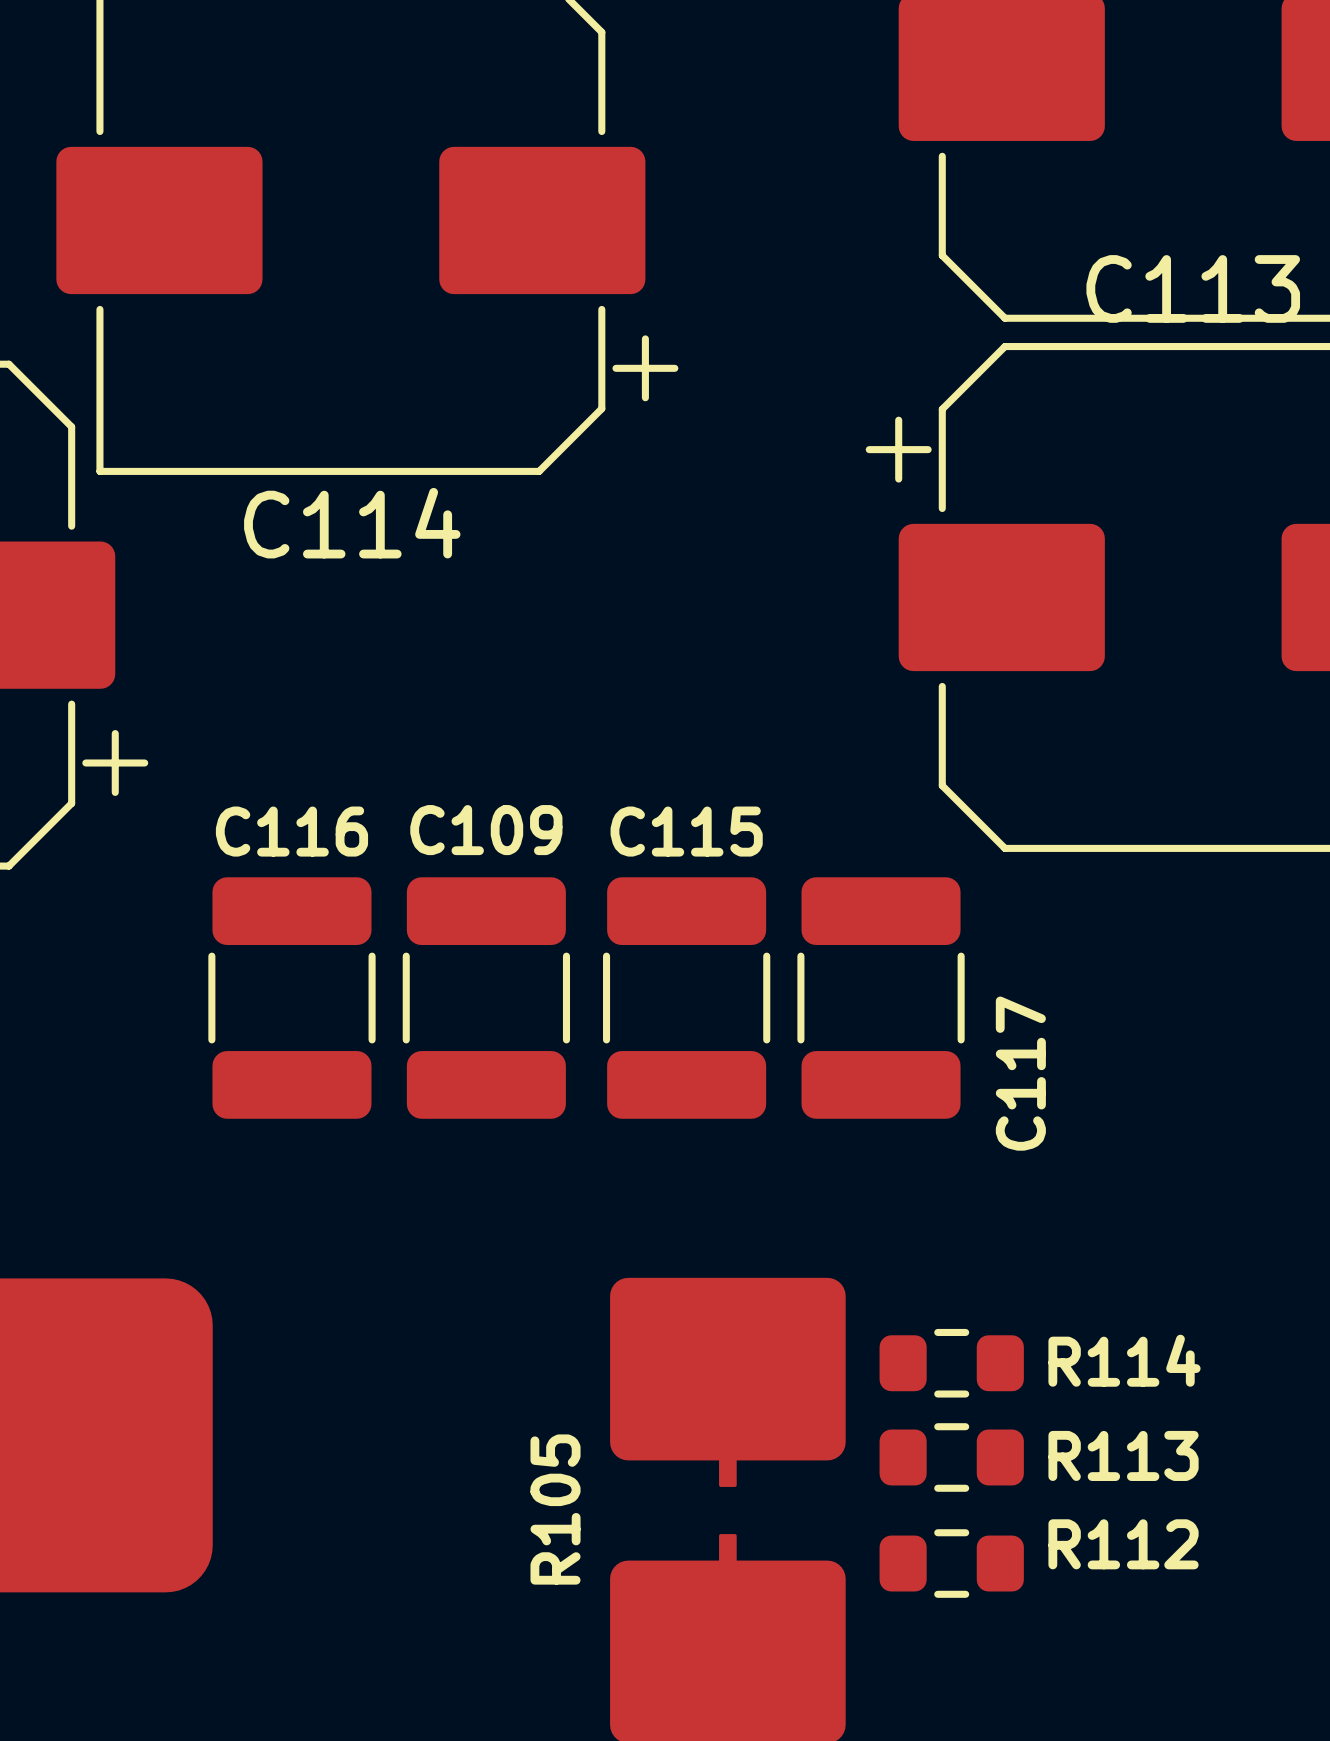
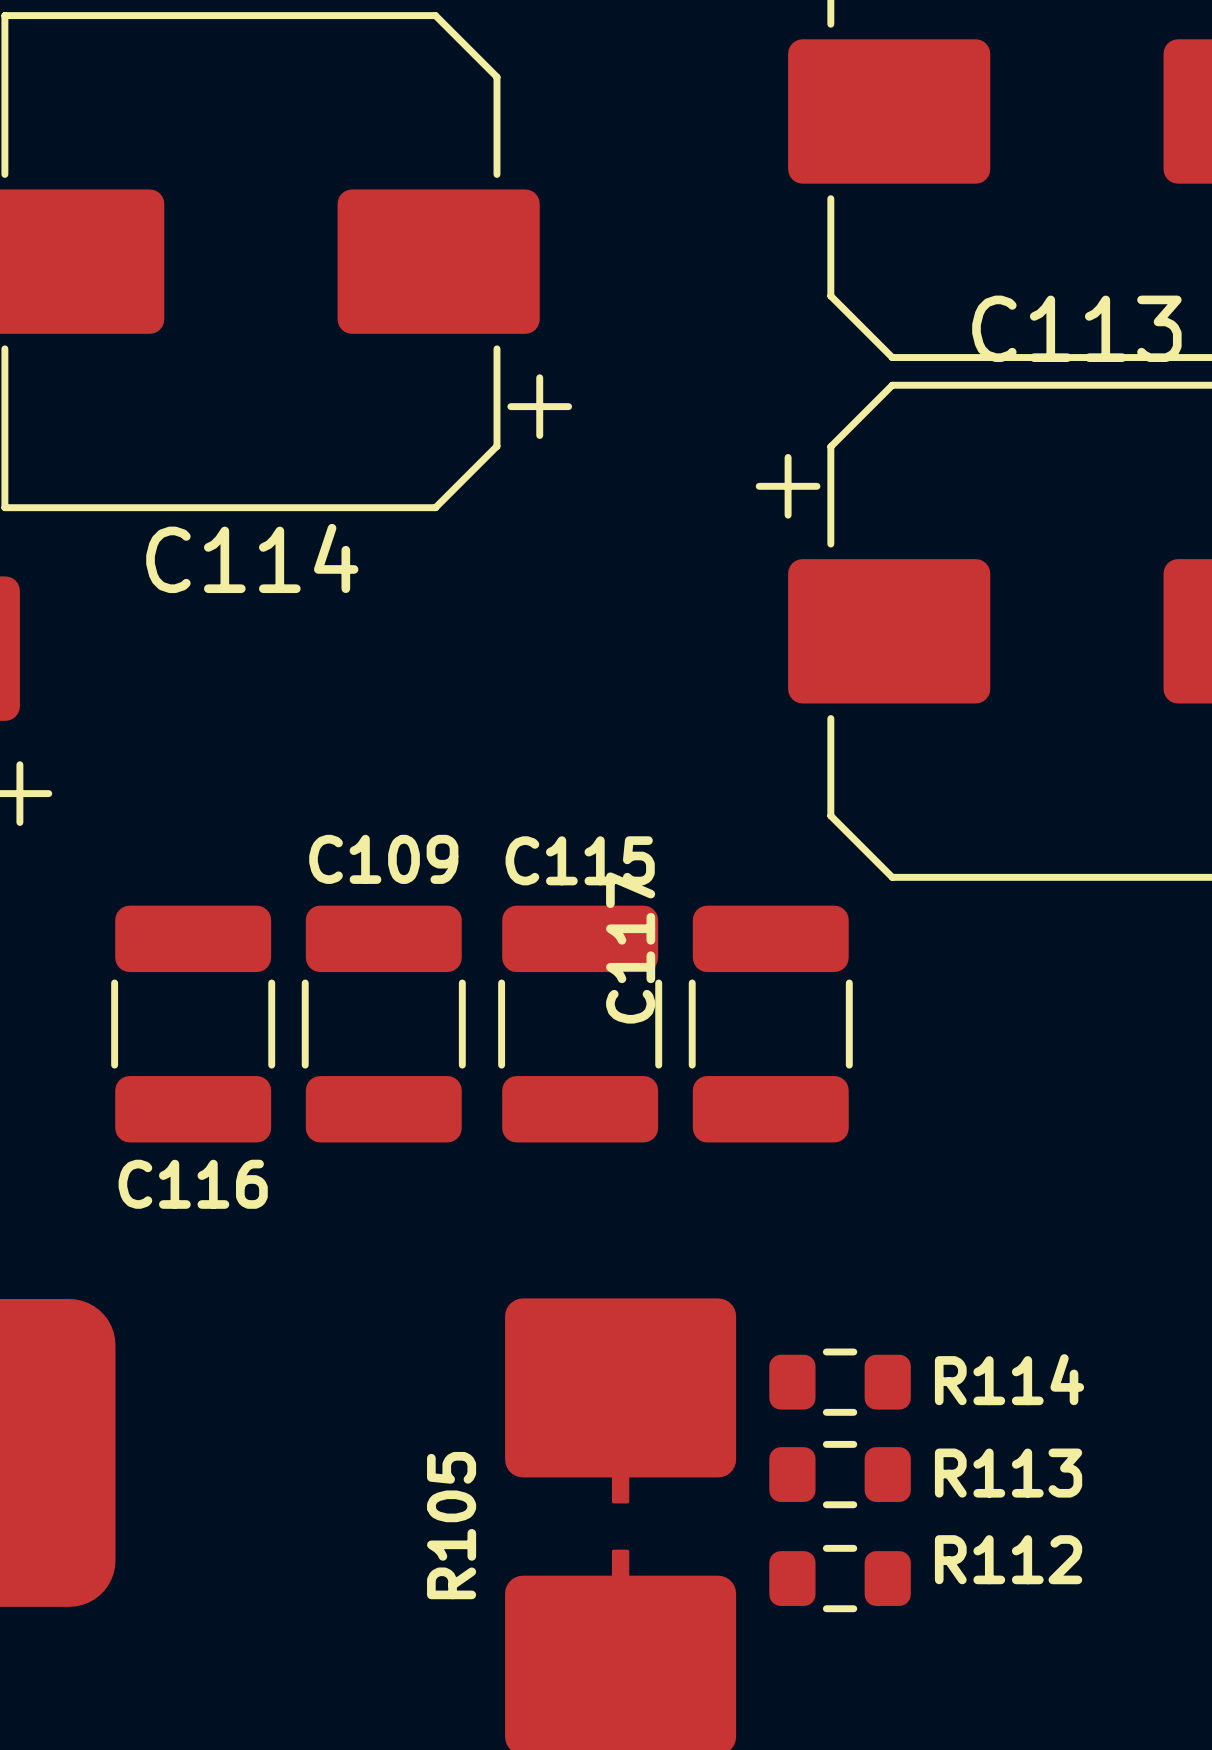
C116 name position: C116 (291, 831) -> C116 (193, 1184)
C117 name position: C117 (1020, 1073) -> C117 (630, 948)

